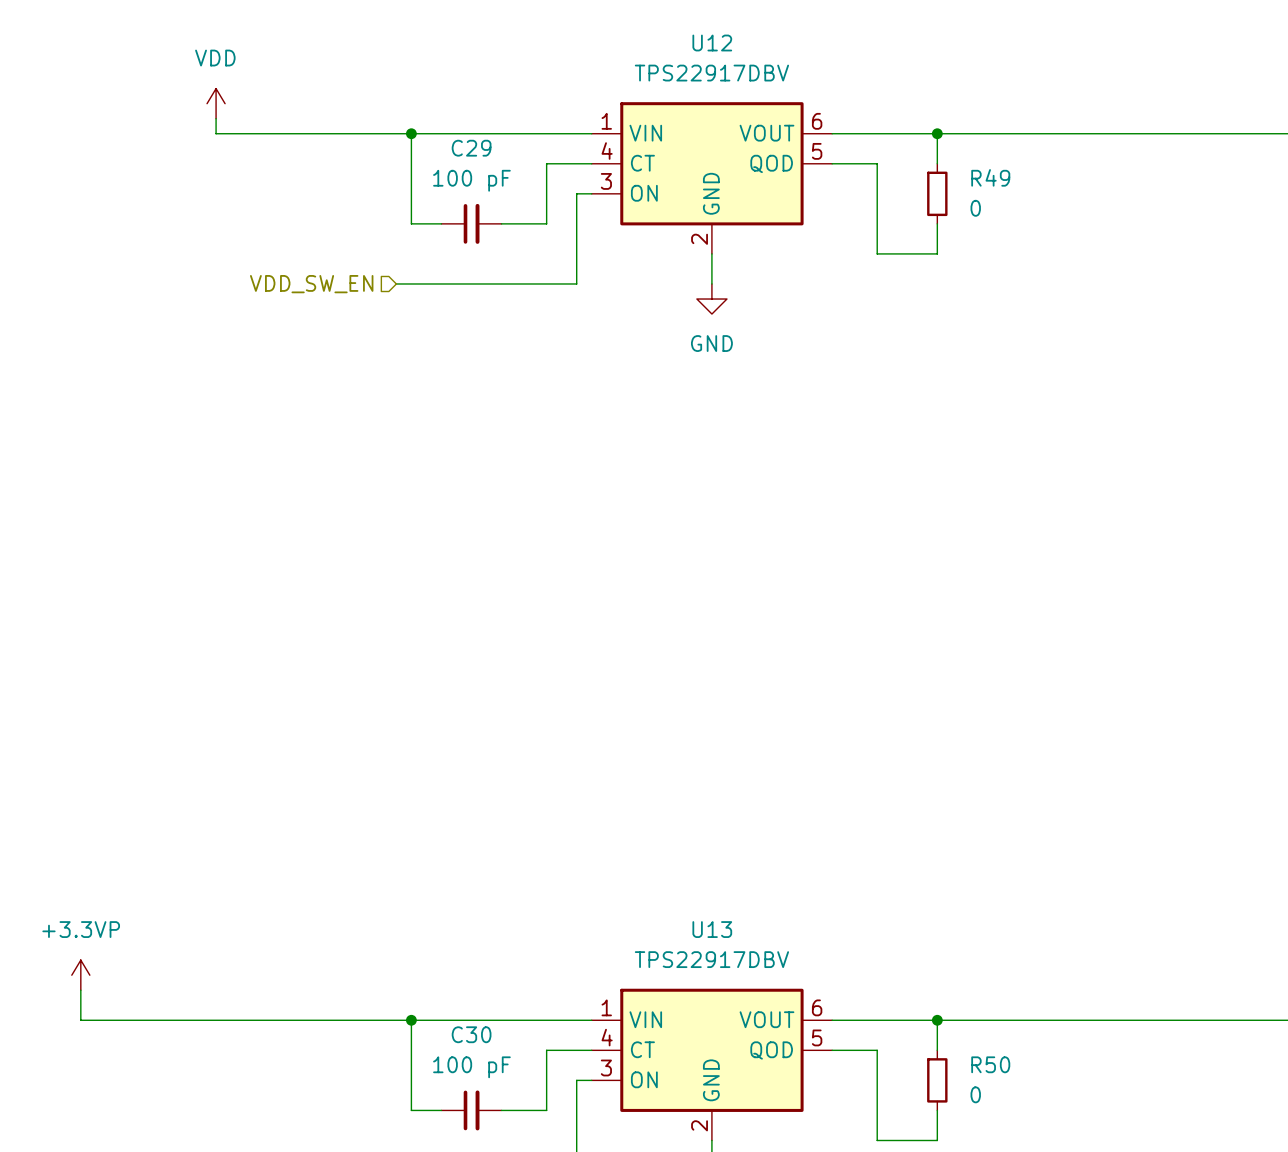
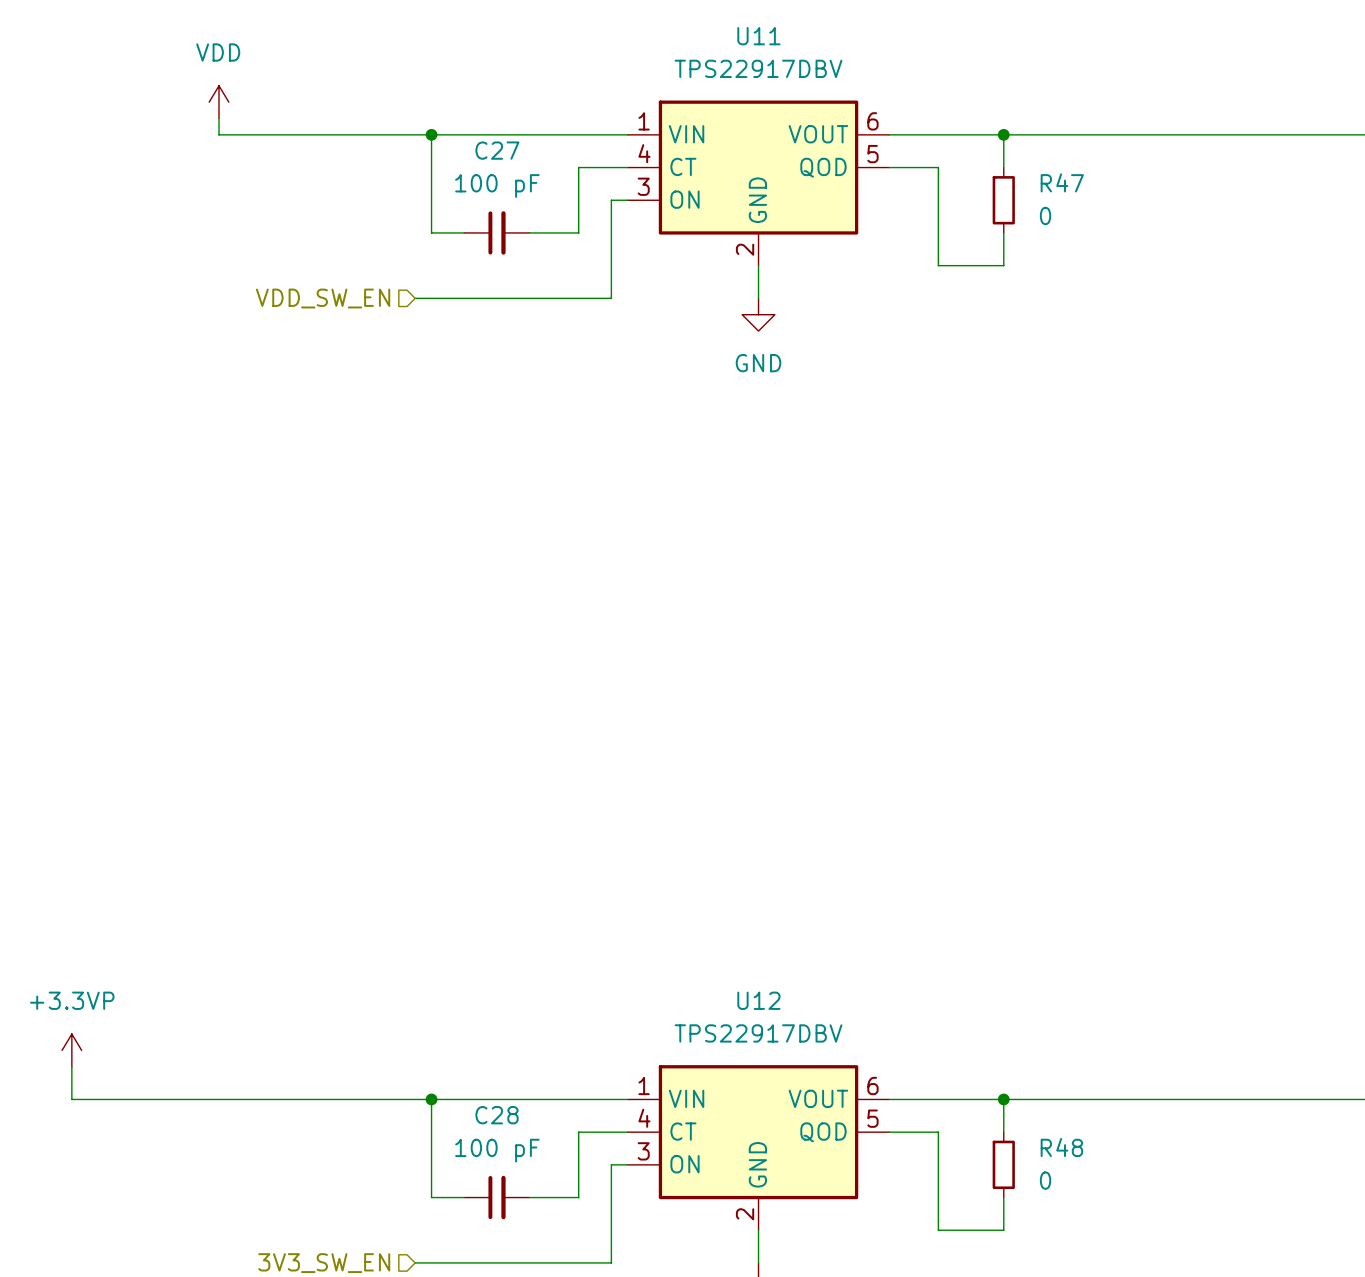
U12 name: U12 (712, 43) -> U11 (758, 36)
C29 name: C29 (471, 148) -> C27 (497, 150)
R49 name: R49 (990, 177) -> R47 (1062, 182)
U13 name: U13 (712, 929) -> U12 (758, 1000)
C30 name: C30 (471, 1034) -> C28 (497, 1115)
R50 name: R50 (990, 1064) -> R48 (1061, 1147)

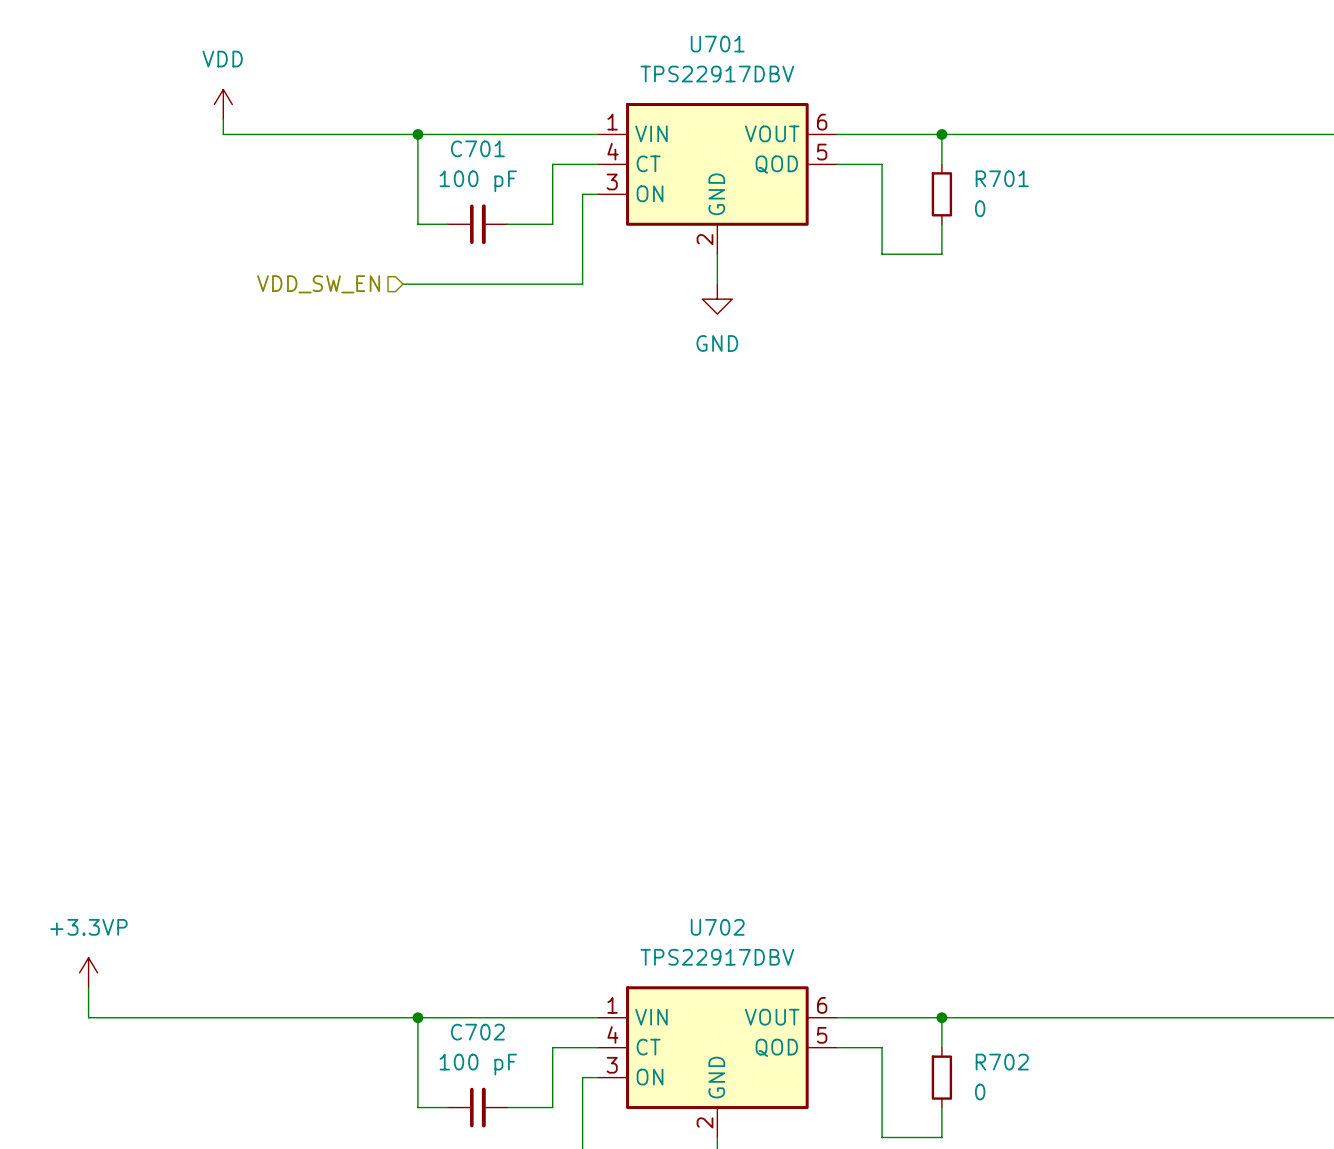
U11 name: U11 (758, 36) -> U701 (717, 44)
C27 name: C27 (497, 150) -> C701 (477, 148)
R47 name: R47 (1062, 182) -> R701 (1002, 178)
U12 name: U12 (758, 1000) -> U702 (717, 927)
C28 name: C28 (497, 1115) -> C702 (477, 1032)
R48 name: R48 (1061, 1147) -> R702 (1002, 1062)

